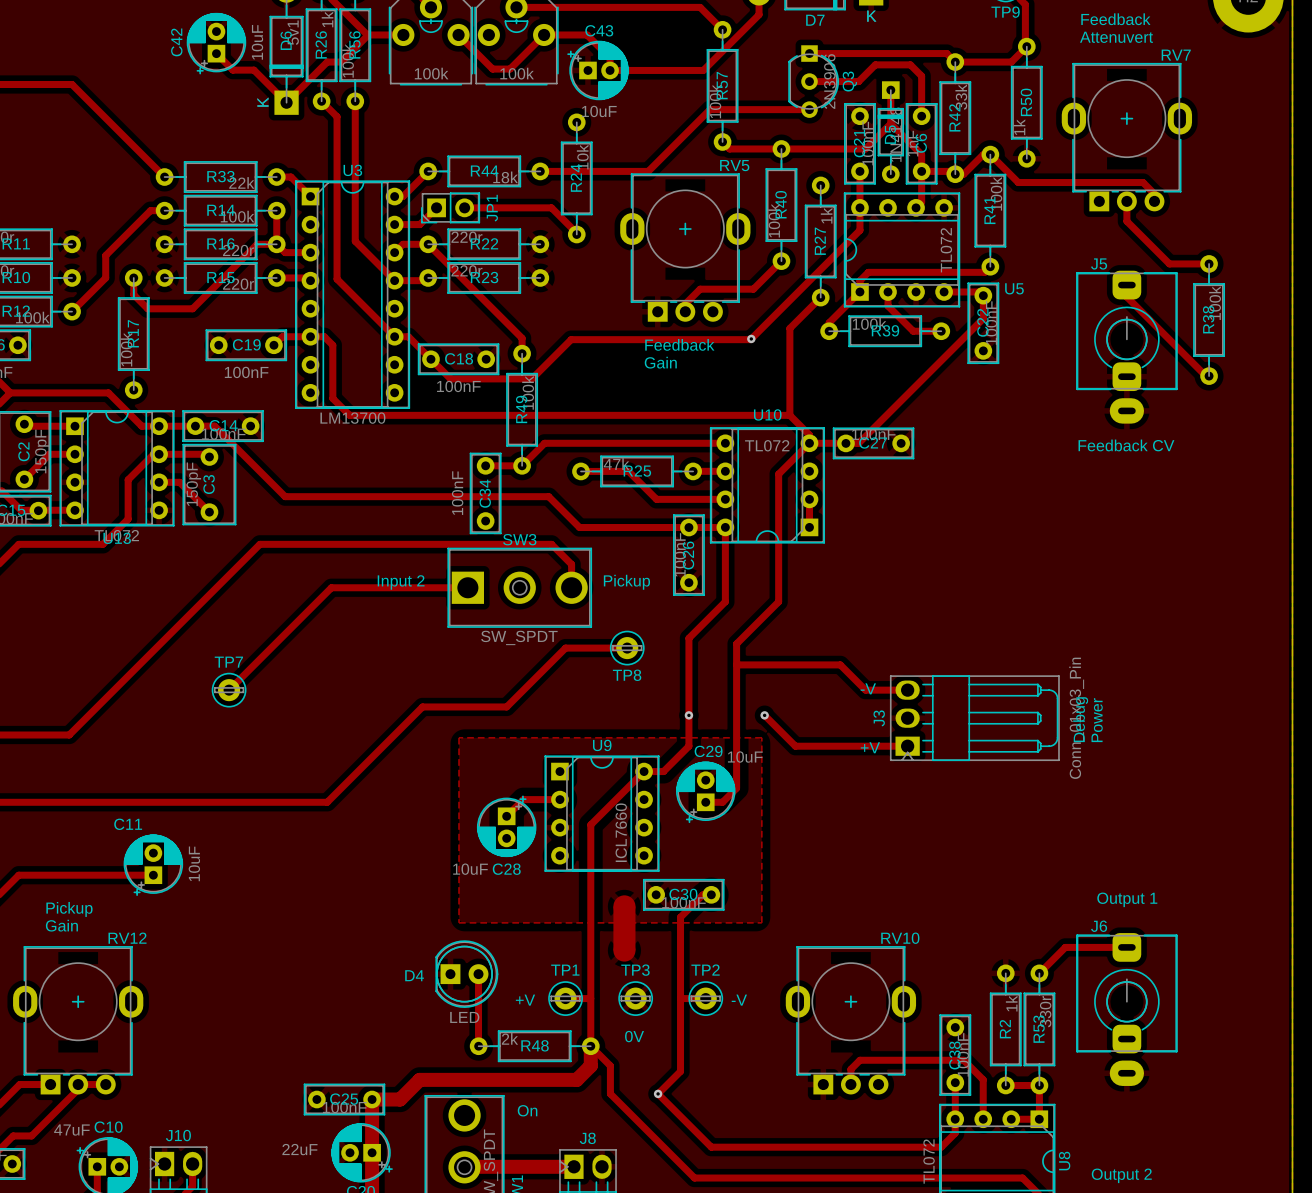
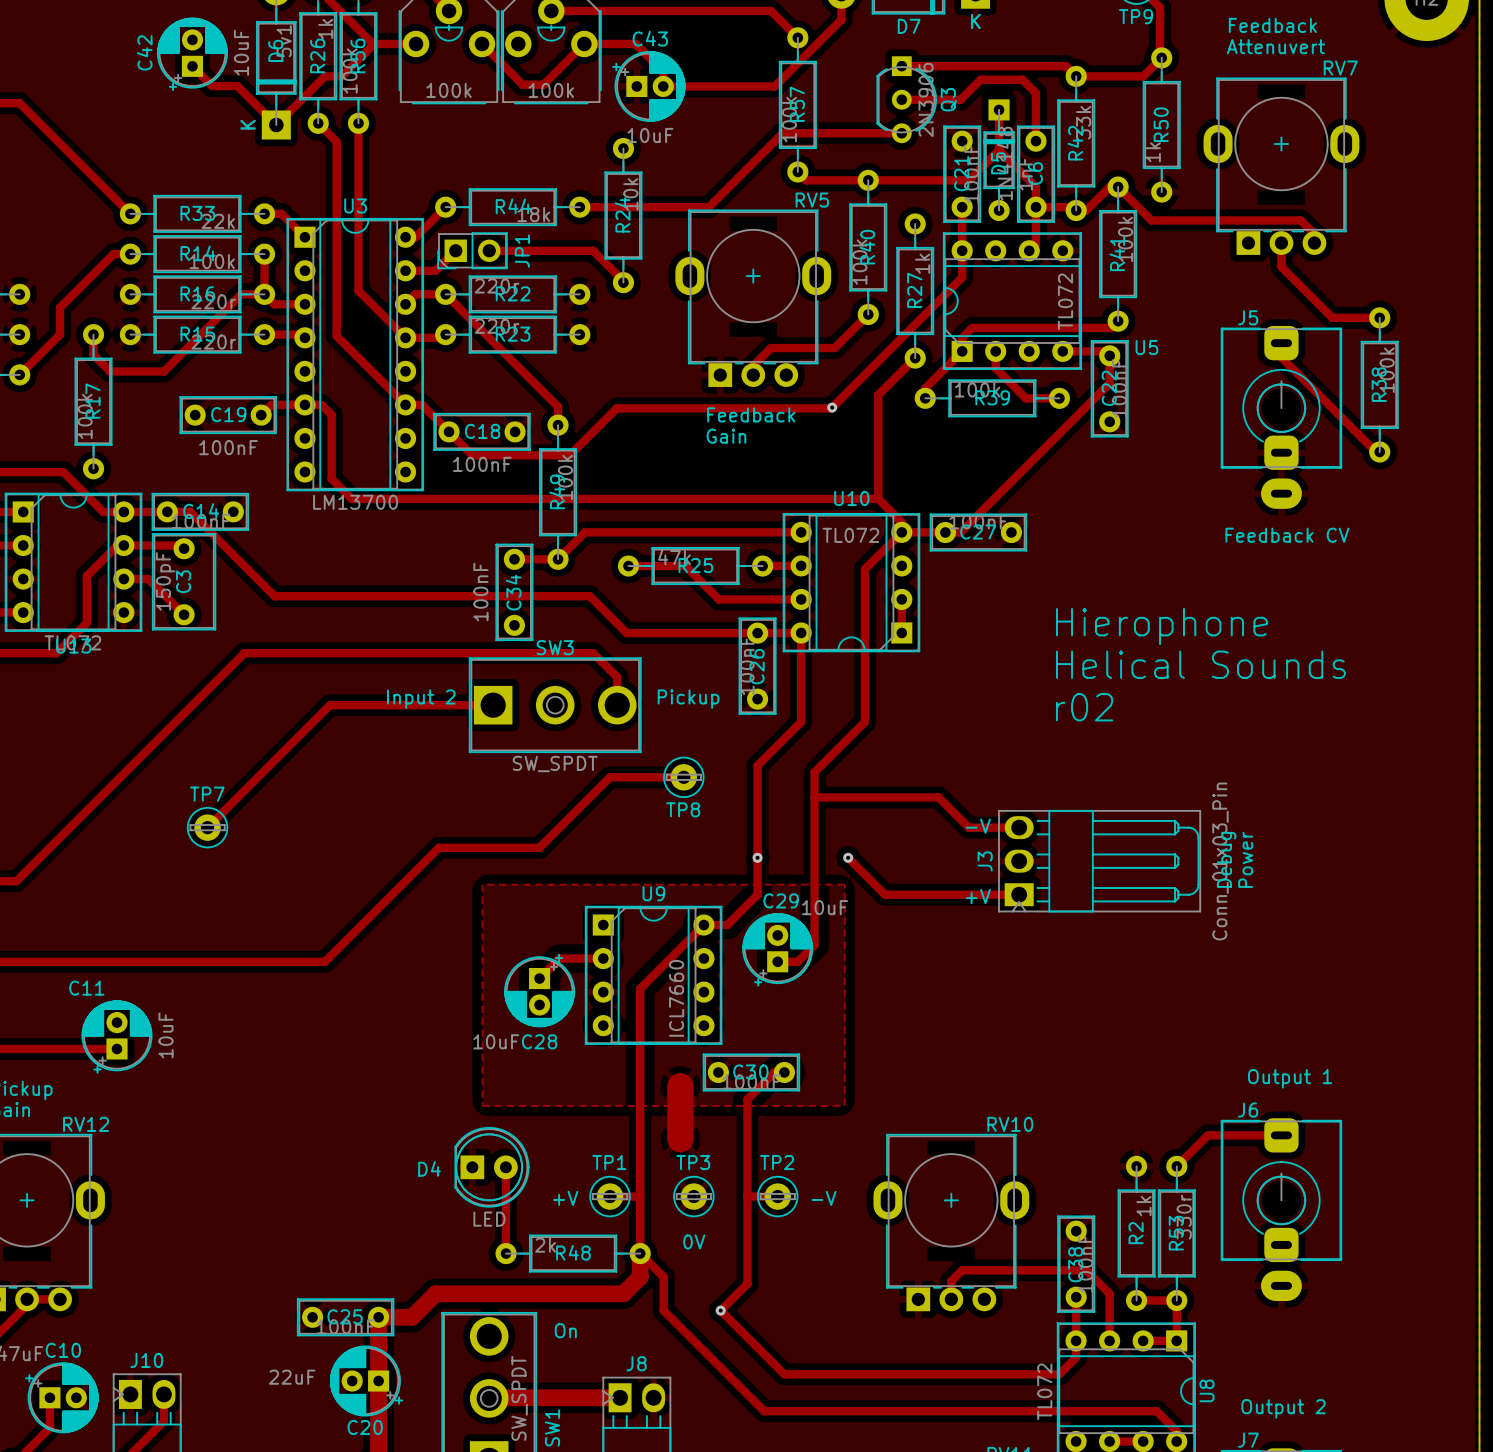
text: none -> Hierophone (1161, 626)
text: none -> Helical Sounds (1200, 664)
text: none -> r02 (1084, 707)

